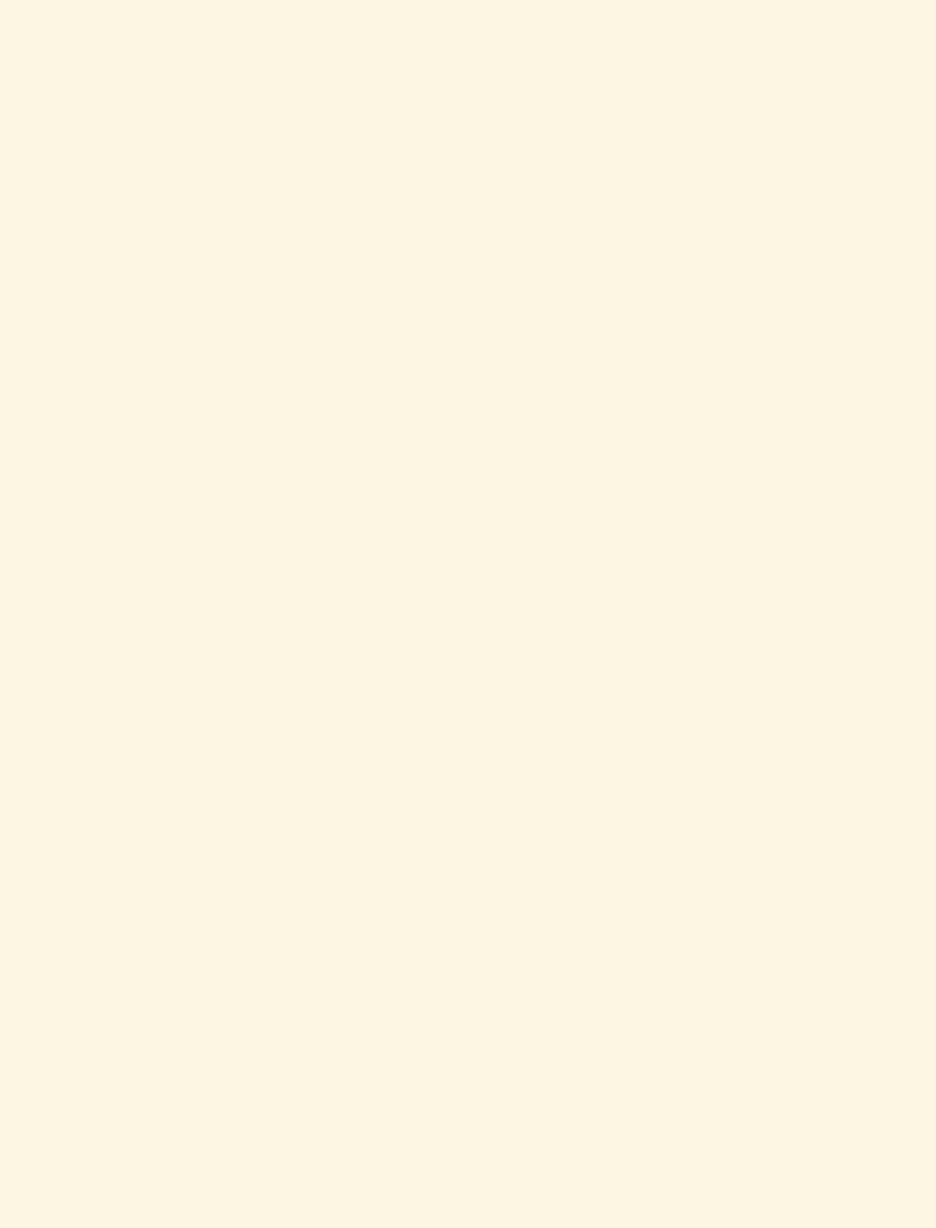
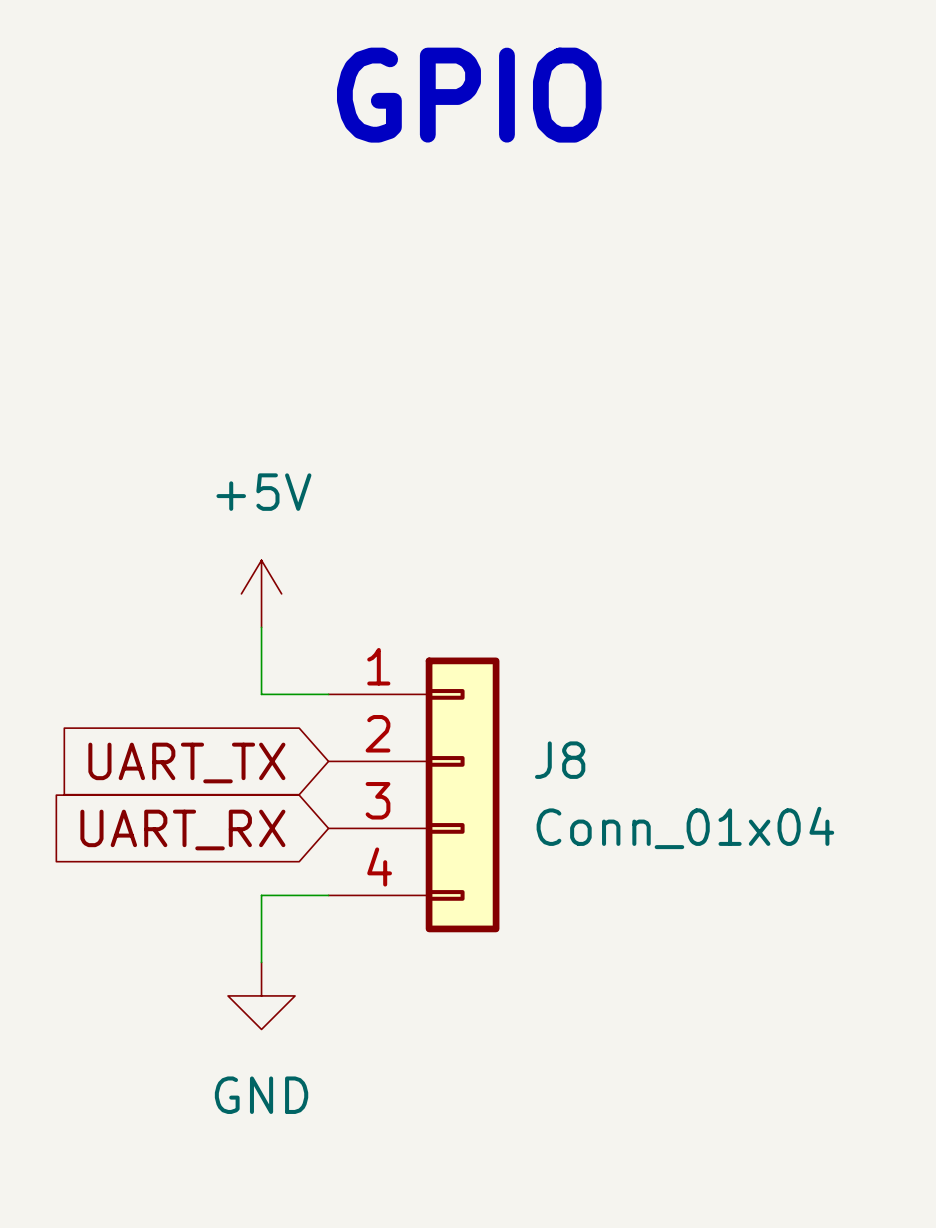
text: none -> GPIO (469, 95)
power symbol: none -> +5V (261, 593)
wire: none -> (261, 627) (261, 694) (328, 694)
global label: none -> UART_TX (186, 763)
J8: none -> Conn_01x04 (413, 794)
global label: none -> UART_RX (182, 830)
wire: none -> (328, 895) (261, 895) (261, 962)
power symbol: none -> GND (261, 995)

